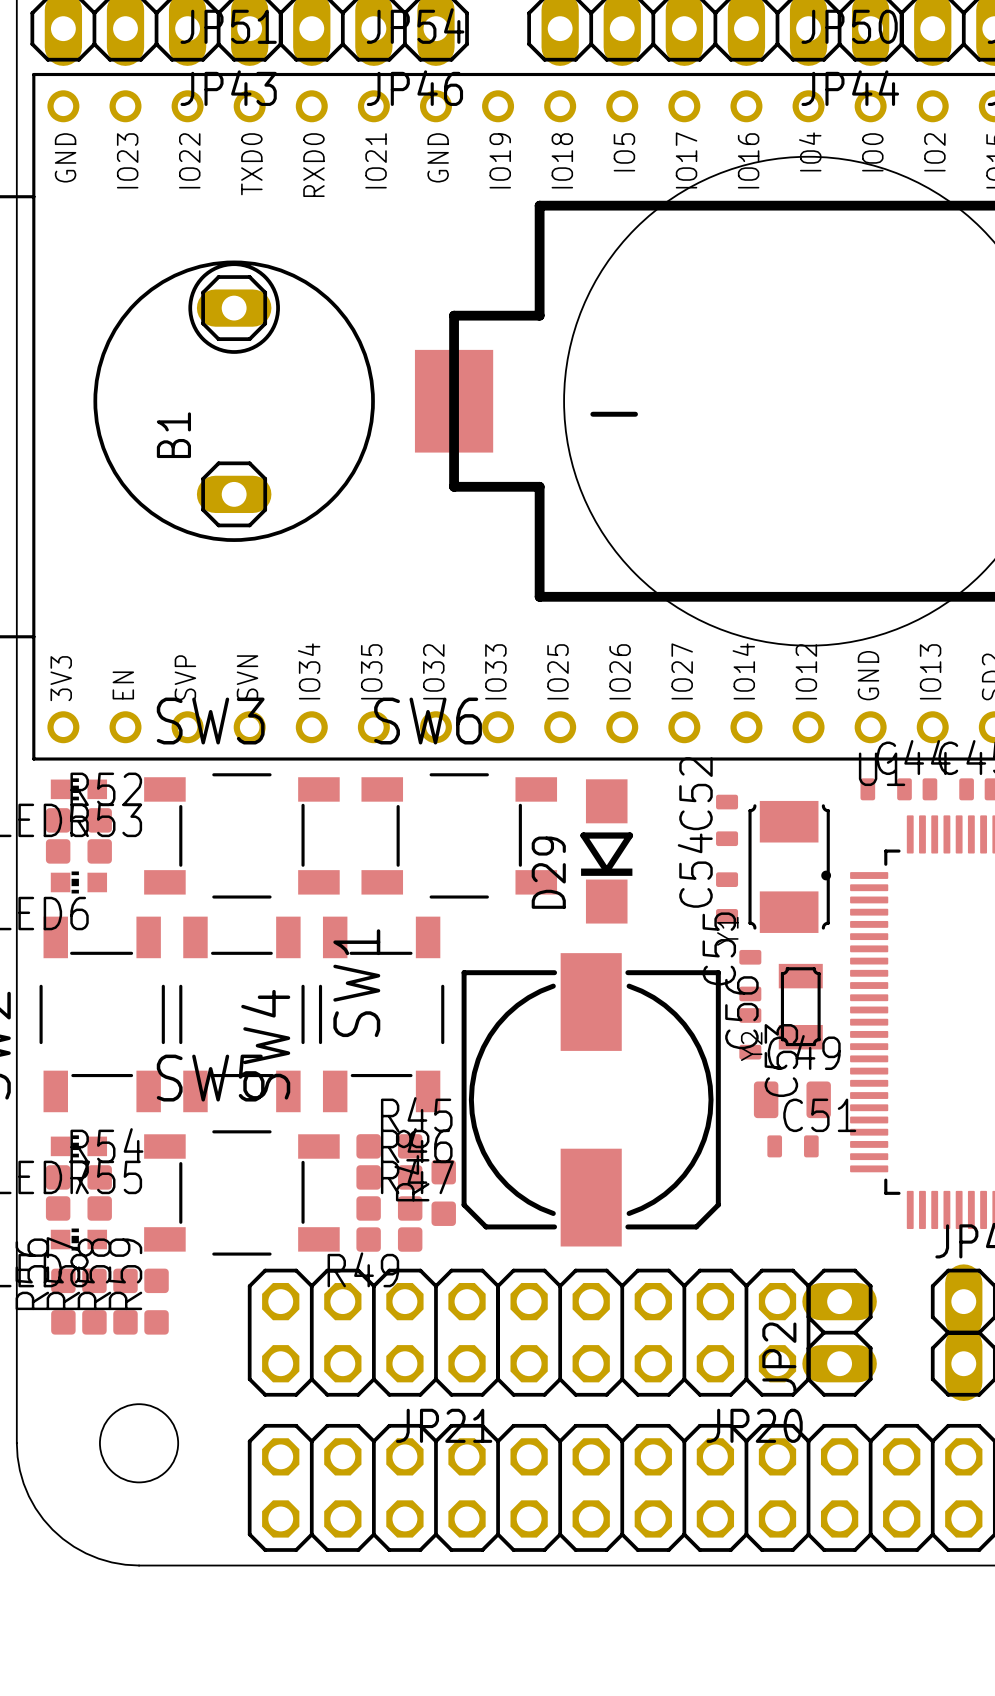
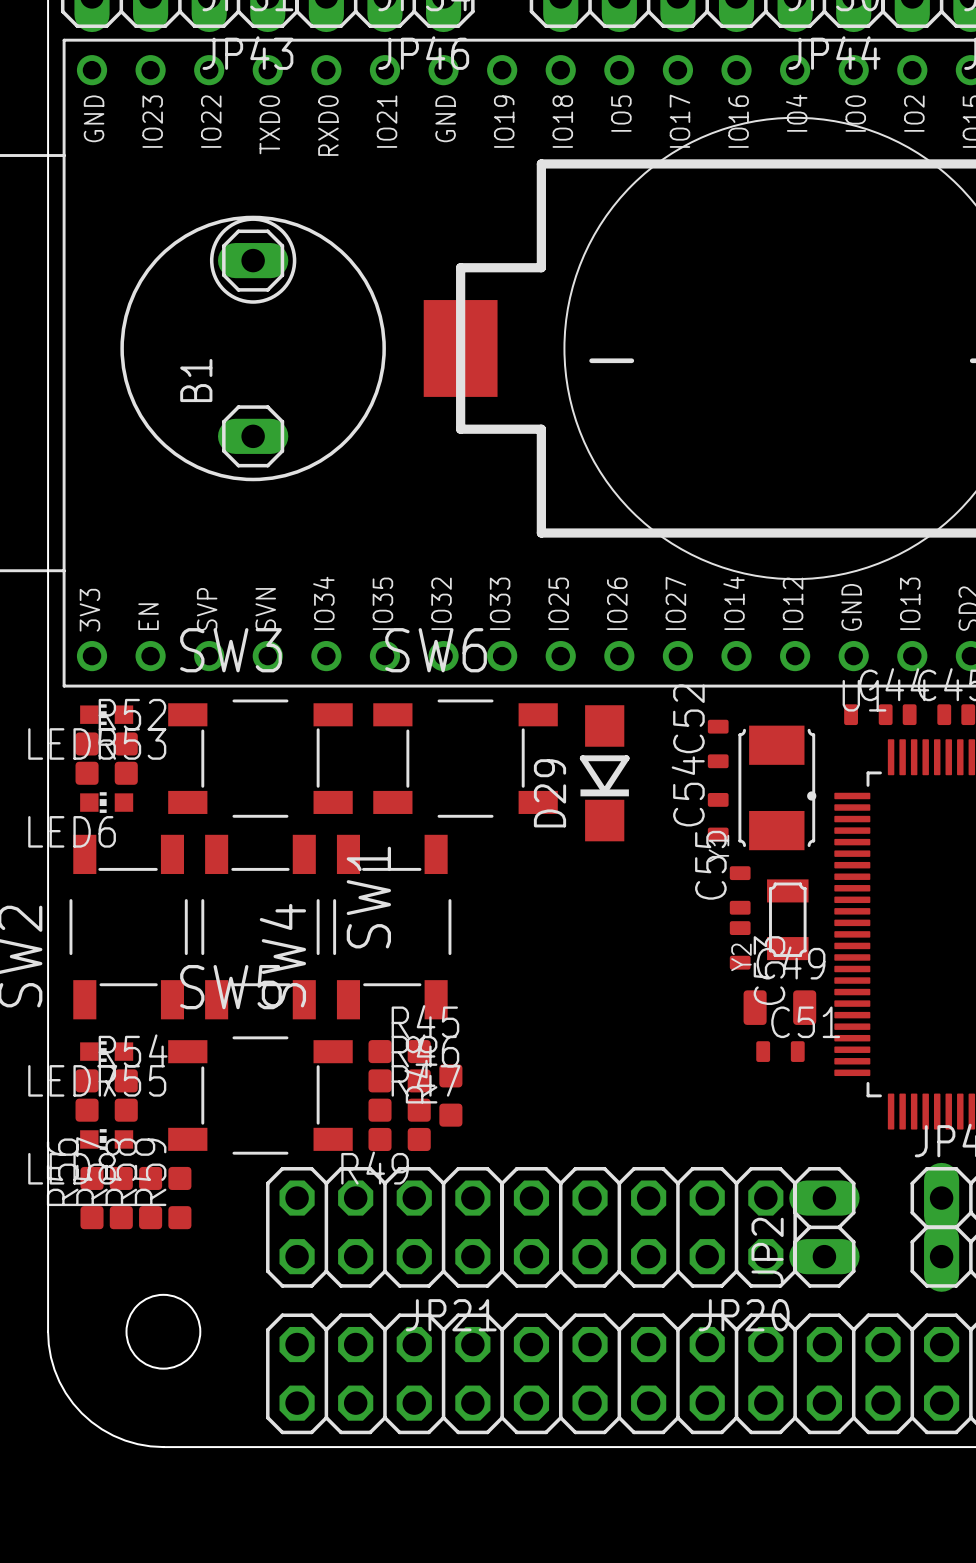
C56: (591, 1099) -> none

